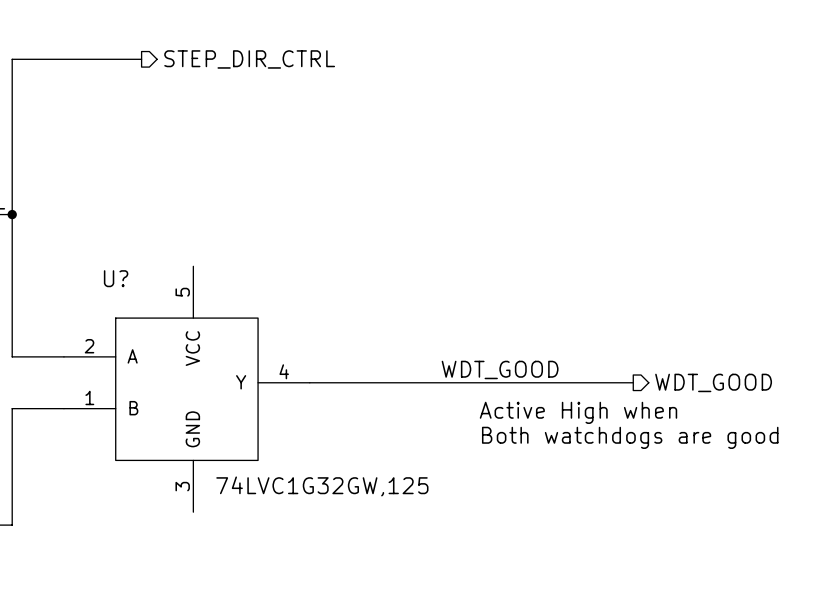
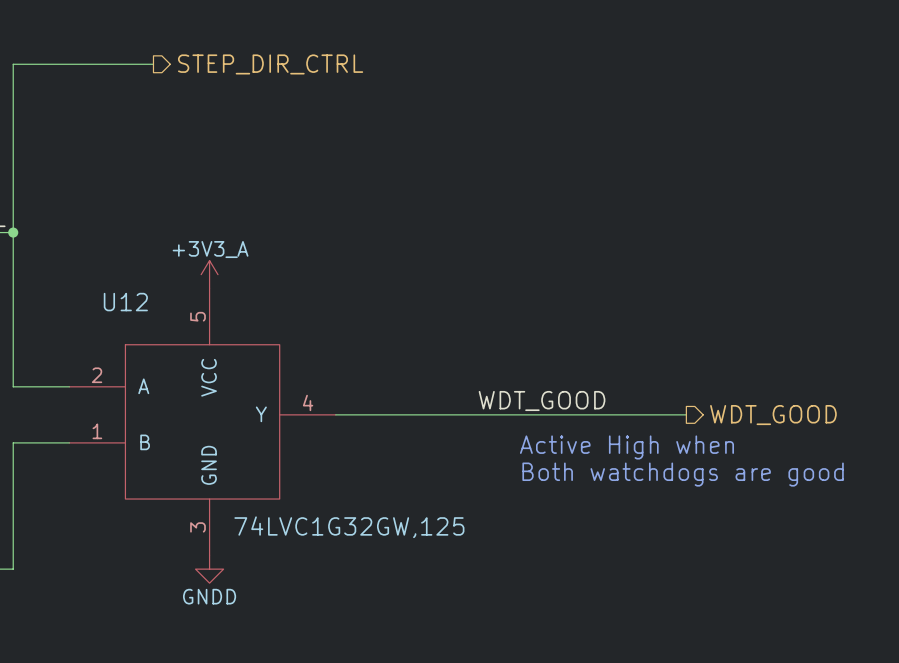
power symbol: none -> +3V3_A (209, 274)
U? name: U? (116, 278) -> U12 (125, 302)
power symbol: none -> GNDD (209, 569)

